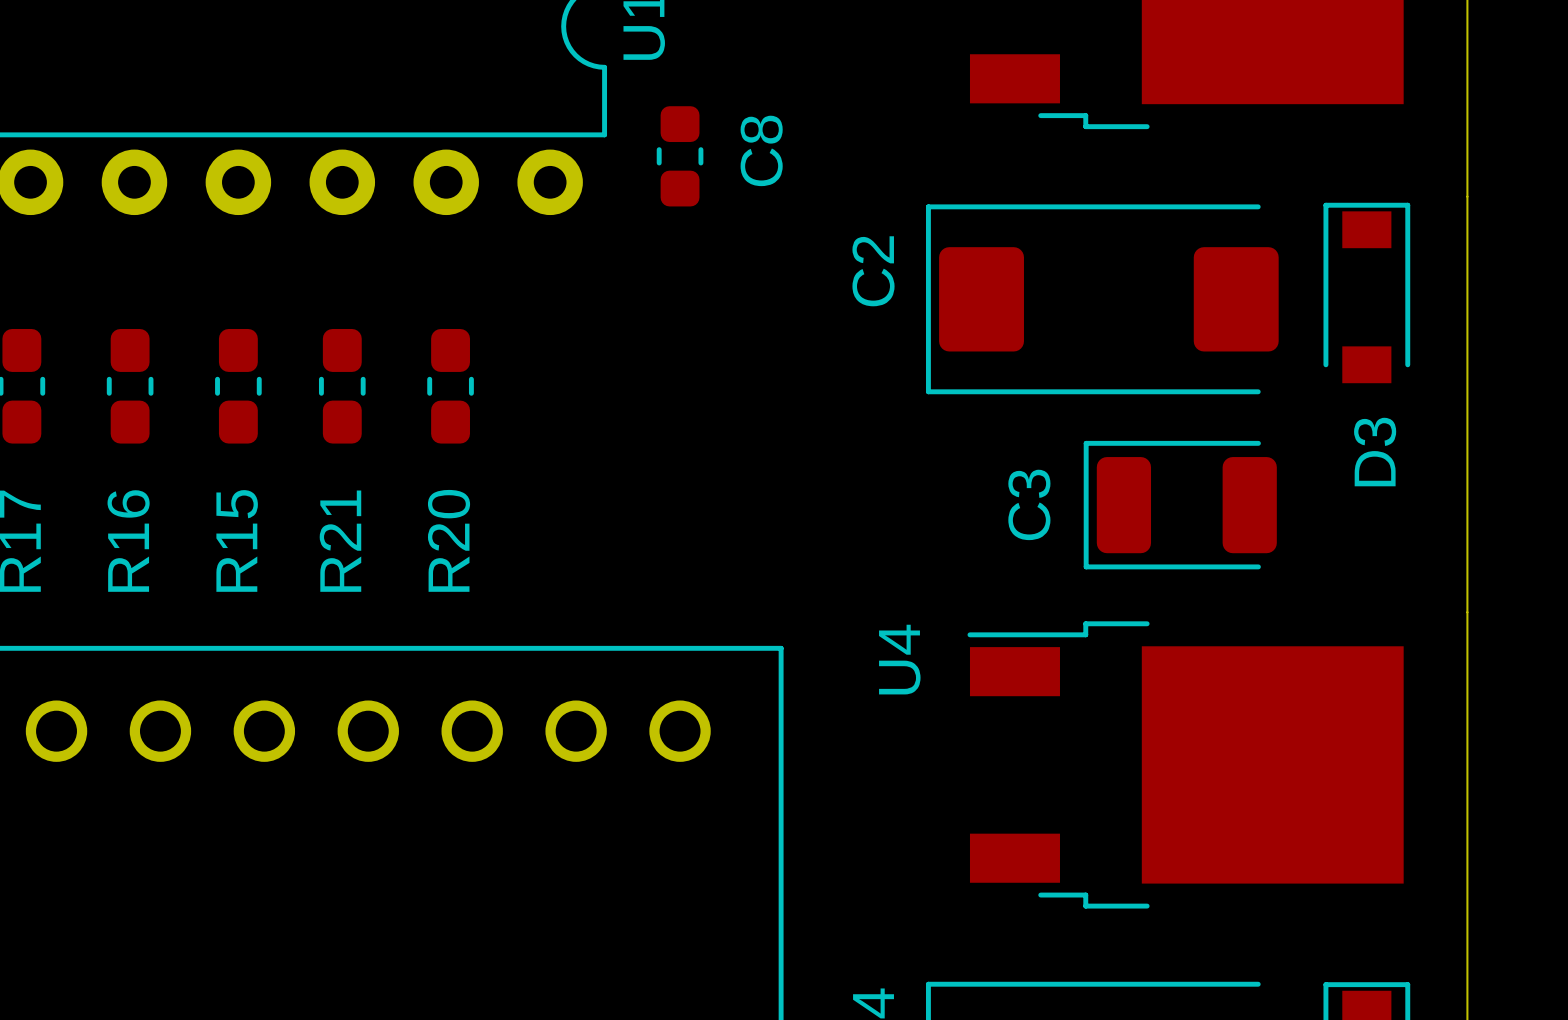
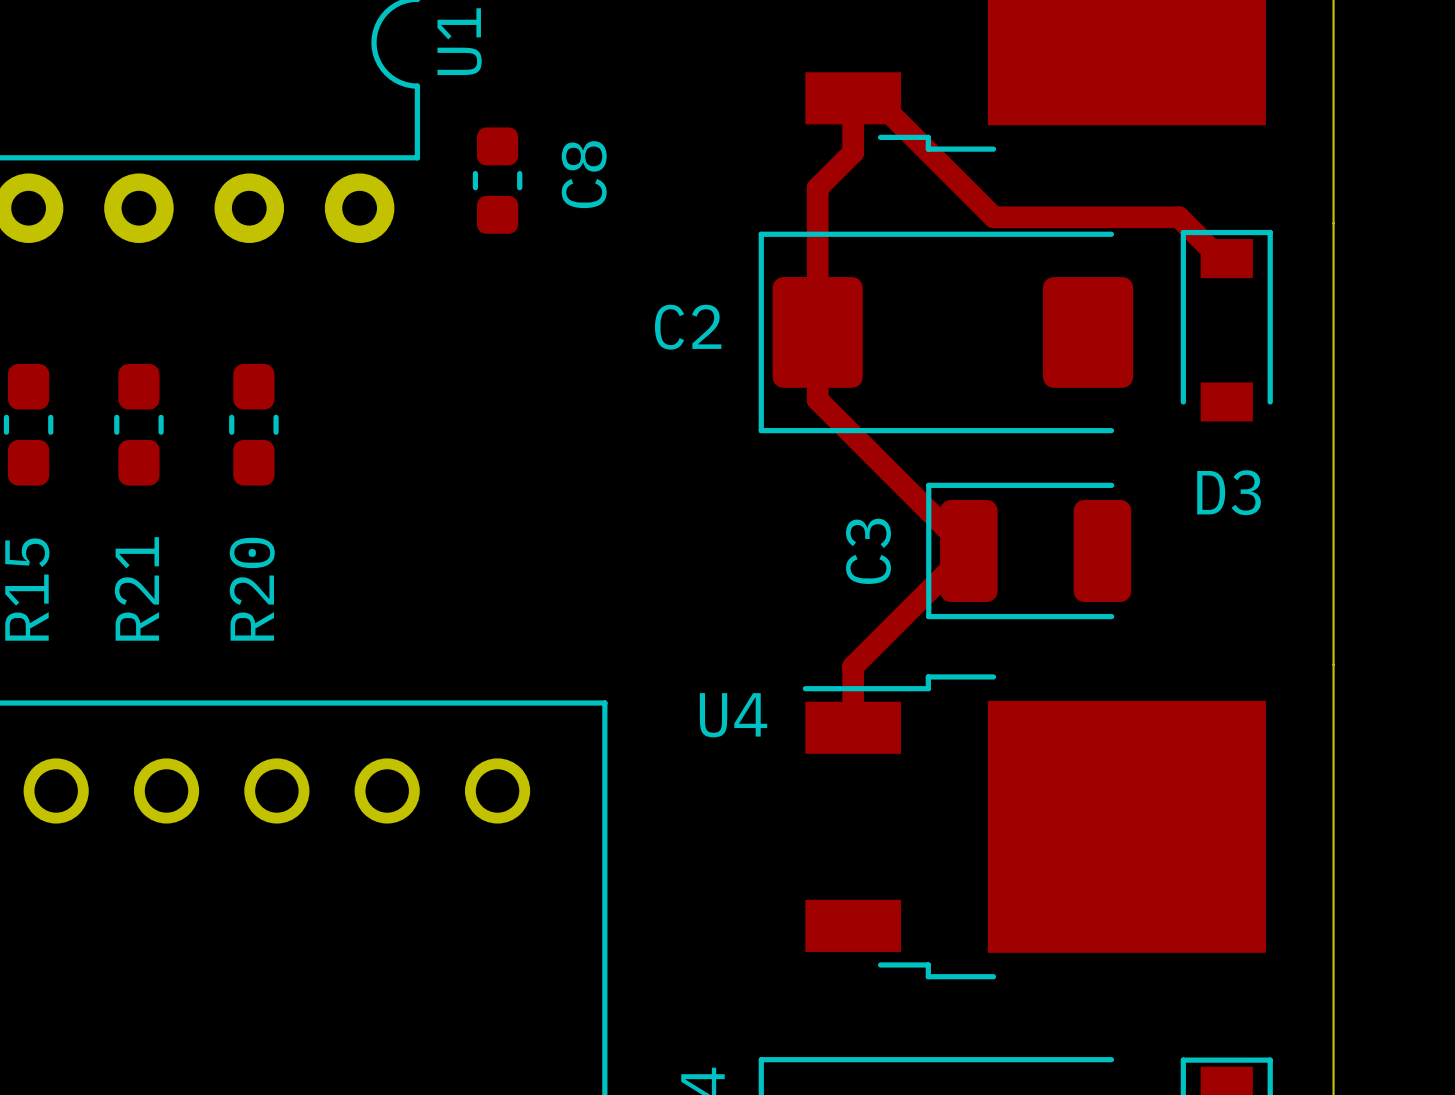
top track: none -> (1226, 258) (1220, 258) (1178, 217) (993, 217) (874, 98) (853, 98) (853, 152) (817, 188) (817, 399) (968, 550) (853, 666) (853, 727)
C2 name rotation: 0° (873, 271) -> 90° clockwise (688, 327)
D3 name rotation: 0° (1375, 452) -> 90° clockwise (1229, 492)
U4 name rotation: 0° (899, 659) -> 90° clockwise (733, 715)

